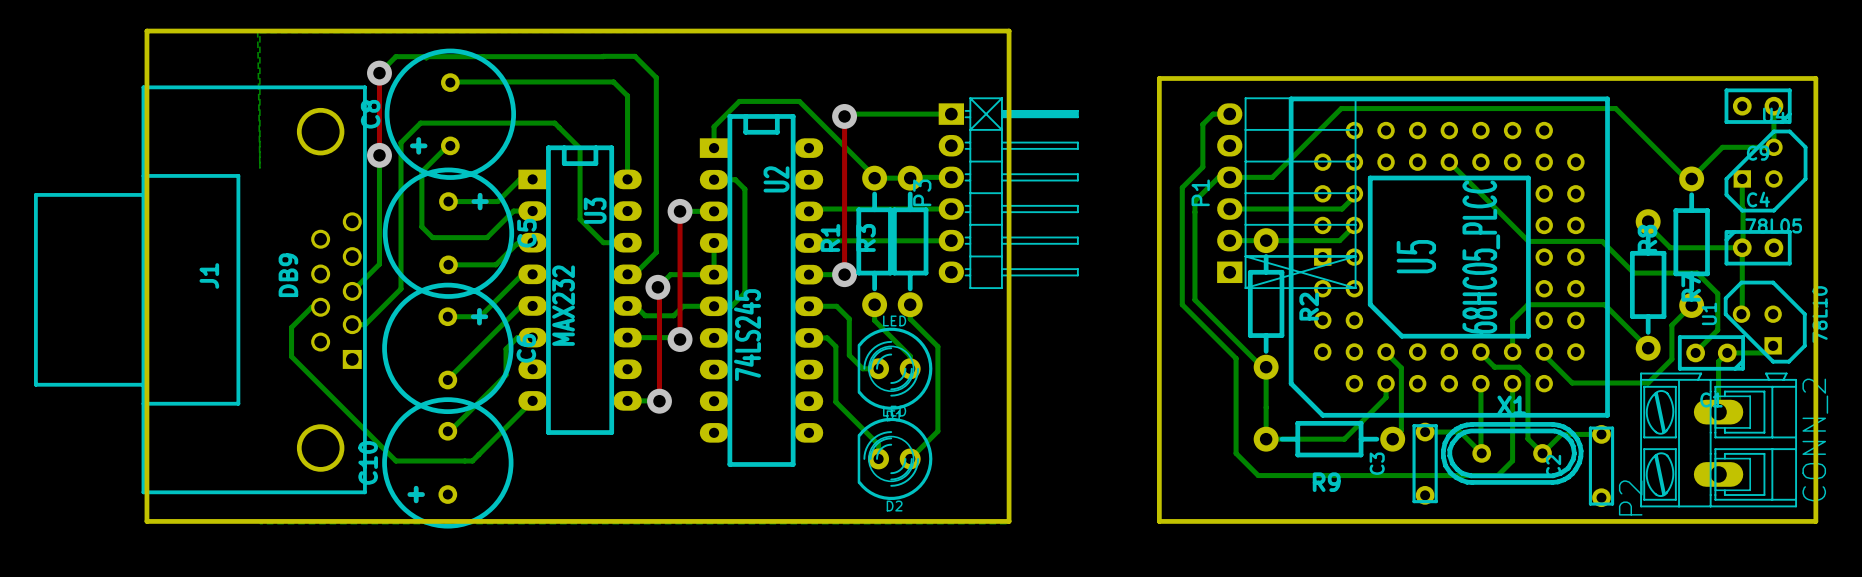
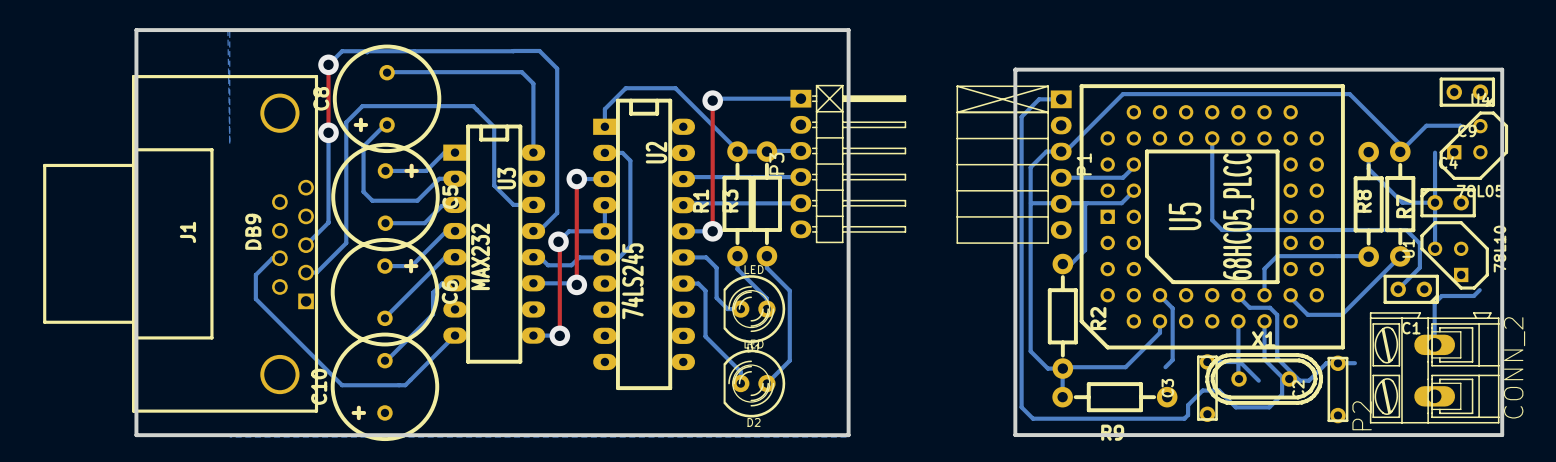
board edge: (1159, 78) (1159, 521) (1815, 521) (1815, 78) (1159, 78) -> none
board edge: none -> (1015, 69) (1015, 435) (1502, 435) (1502, 69) (1015, 70)
bottom track: (1773, 106) (1773, 147) (1722, 147) (1691, 178) (1686, 178) -> none
bottom track: (1229, 114) (1213, 114) (1202, 124) (1202, 167) (1182, 187) (1182, 304) (1236, 358) (1236, 453) (1258, 475) (1497, 475) (1512, 460) (1512, 429) -> (1061, 99) (1039, 99) (1021, 116) (1021, 407) (1033, 418) (1184, 418) (1188, 415) (1188, 405) (1202, 390) (1219, 390) (1235, 407) (1269, 407) (1282, 394) (1282, 377) (1264, 359)
bottom track: none -> (1461, 126) (1426, 125) (1400, 151)
bottom track: (1449, 162) (1528, 241) (1602, 241) (1633, 273) -> (1212, 138) (1212, 220) (1222, 230) (1364, 230)
bottom track: (1272, 177) (1218, 177) (1194, 201) (1194, 299) (1262, 367) (1266, 367) (1266, 439) -> none
bottom track: none -> (1061, 151) (1046, 151) (1030, 167) (1030, 351) (1047, 368) (1062, 368) (1062, 397)
bottom track: none -> (1368, 152) (1368, 168) (1402, 202) (1435, 202)
bottom track: (1742, 178) (1742, 247) -> none
bottom track: none -> (1435, 152) (1435, 248)
P1 rotation: 0° (1286, 193) -> 180° (1014, 164)
bottom track: (1229, 209) (1342, 209) -> (1061, 177) (1123, 177)
bottom track: (1648, 221) (1648, 225) (1670, 247) (1742, 247) -> none
bottom track: none -> (1085, 203) (1085, 250) (1071, 264) (1062, 264)
R8 position: (1691, 242) -> (1400, 204)
bottom track: (1742, 247) (1741, 314) -> none
C4 position: (1758, 247) -> (1448, 202)
bottom track: (1684, 273) (1697, 273) (1717, 293) (1717, 330) (1695, 352) -> (1406, 230) (1419, 243) (1419, 267) (1398, 289)
R7 position: (1648, 284) -> (1368, 204)
R2 position: (1266, 303) -> (1062, 316)
bottom track: (1604, 304) (1648, 348) -> (1340, 256) (1368, 256)
bottom track: (1691, 305) (1671, 325) (1671, 359) (1648, 383) (1572, 383) (1564, 375) -> (1400, 256) (1341, 314) (1307, 314)
U1 position: (1765, 322) -> (1454, 255)
C1 position: (1711, 352) -> (1411, 289)
bottom track: (1527, 428) (1527, 438) (1542, 453) (1561, 434) (1601, 434) -> (1277, 358) (1299, 380) (1309, 380) (1326, 363) (1354, 363)
bottom track: (1425, 432) (1460, 432) (1481, 453) -> none
bottom track: none -> (1207, 361) (1240, 361) (1258, 380)
R9 position: (1329, 439) -> (1114, 397)
C3 position: (1425, 463) -> (1207, 388)

